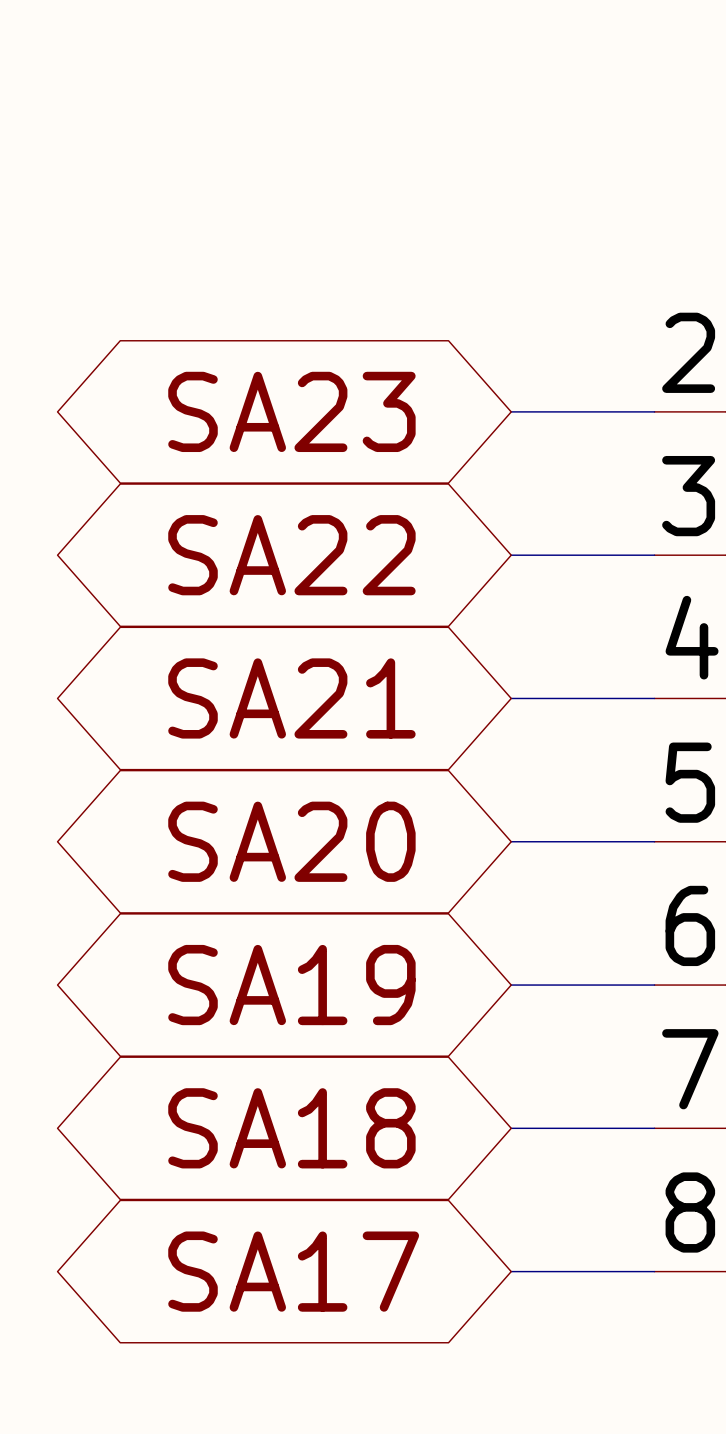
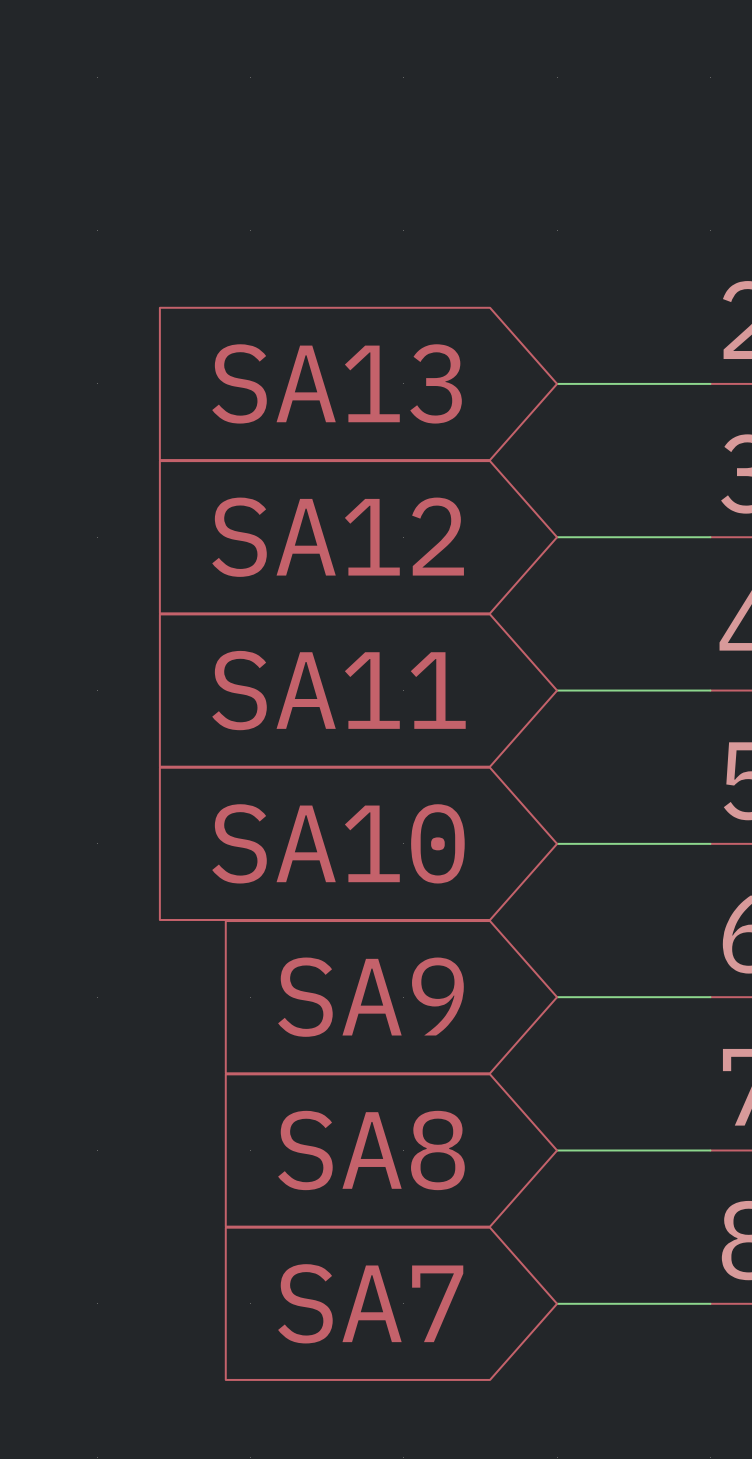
global label shape: bidirectional (291, 411) -> input (337, 383)
global label: SA23 (291, 411) -> SA13 (337, 383)
global label shape: bidirectional (291, 555) -> input (338, 537)
global label: SA22 (291, 555) -> SA12 (338, 537)
global label shape: bidirectional (291, 698) -> input (338, 690)
global label: SA21 (291, 698) -> SA11 (338, 690)
global label shape: bidirectional (291, 841) -> input (338, 843)
global label: SA20 (291, 841) -> SA10 (338, 843)
global label shape: bidirectional (291, 985) -> input (370, 997)
global label: SA19 (291, 985) -> SA9 (370, 997)
global label shape: bidirectional (291, 1128) -> input (371, 1150)
global label: SA18 (291, 1128) -> SA8 (371, 1150)
global label shape: bidirectional (293, 1271) -> input (370, 1303)
global label: SA17 (293, 1271) -> SA7 (370, 1303)

